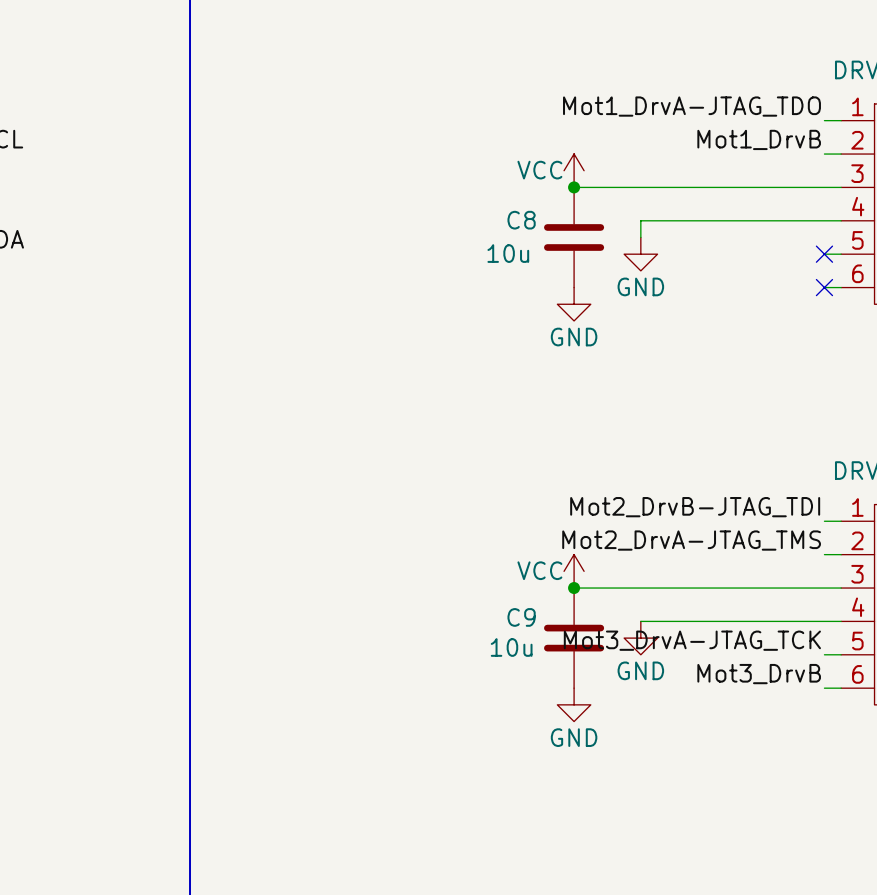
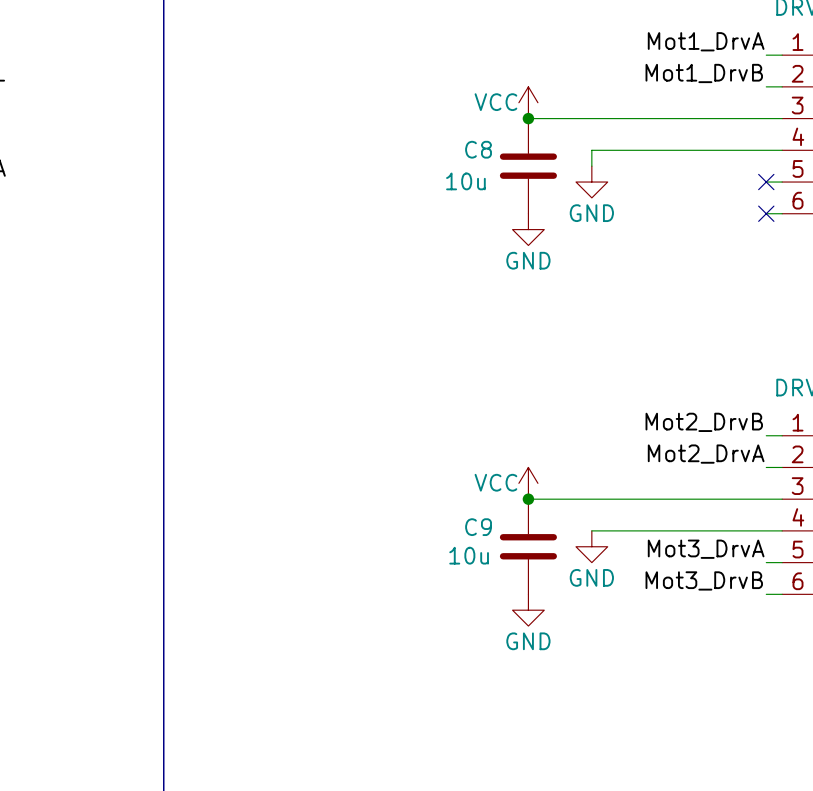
label: Mot1_DrvA-JTAG_TDO (691, 106) -> Mot1_DrvA (706, 41)
label: Mot2_DrvB-JTAG_TDI (695, 507) -> Mot2_DrvB (704, 422)
label: Mot2_DrvA-JTAG_TMS (691, 540) -> Mot2_DrvA (706, 454)
label: Mot3_DrvA-JTAG_TCK (692, 640) -> Mot3_DrvA (706, 549)

